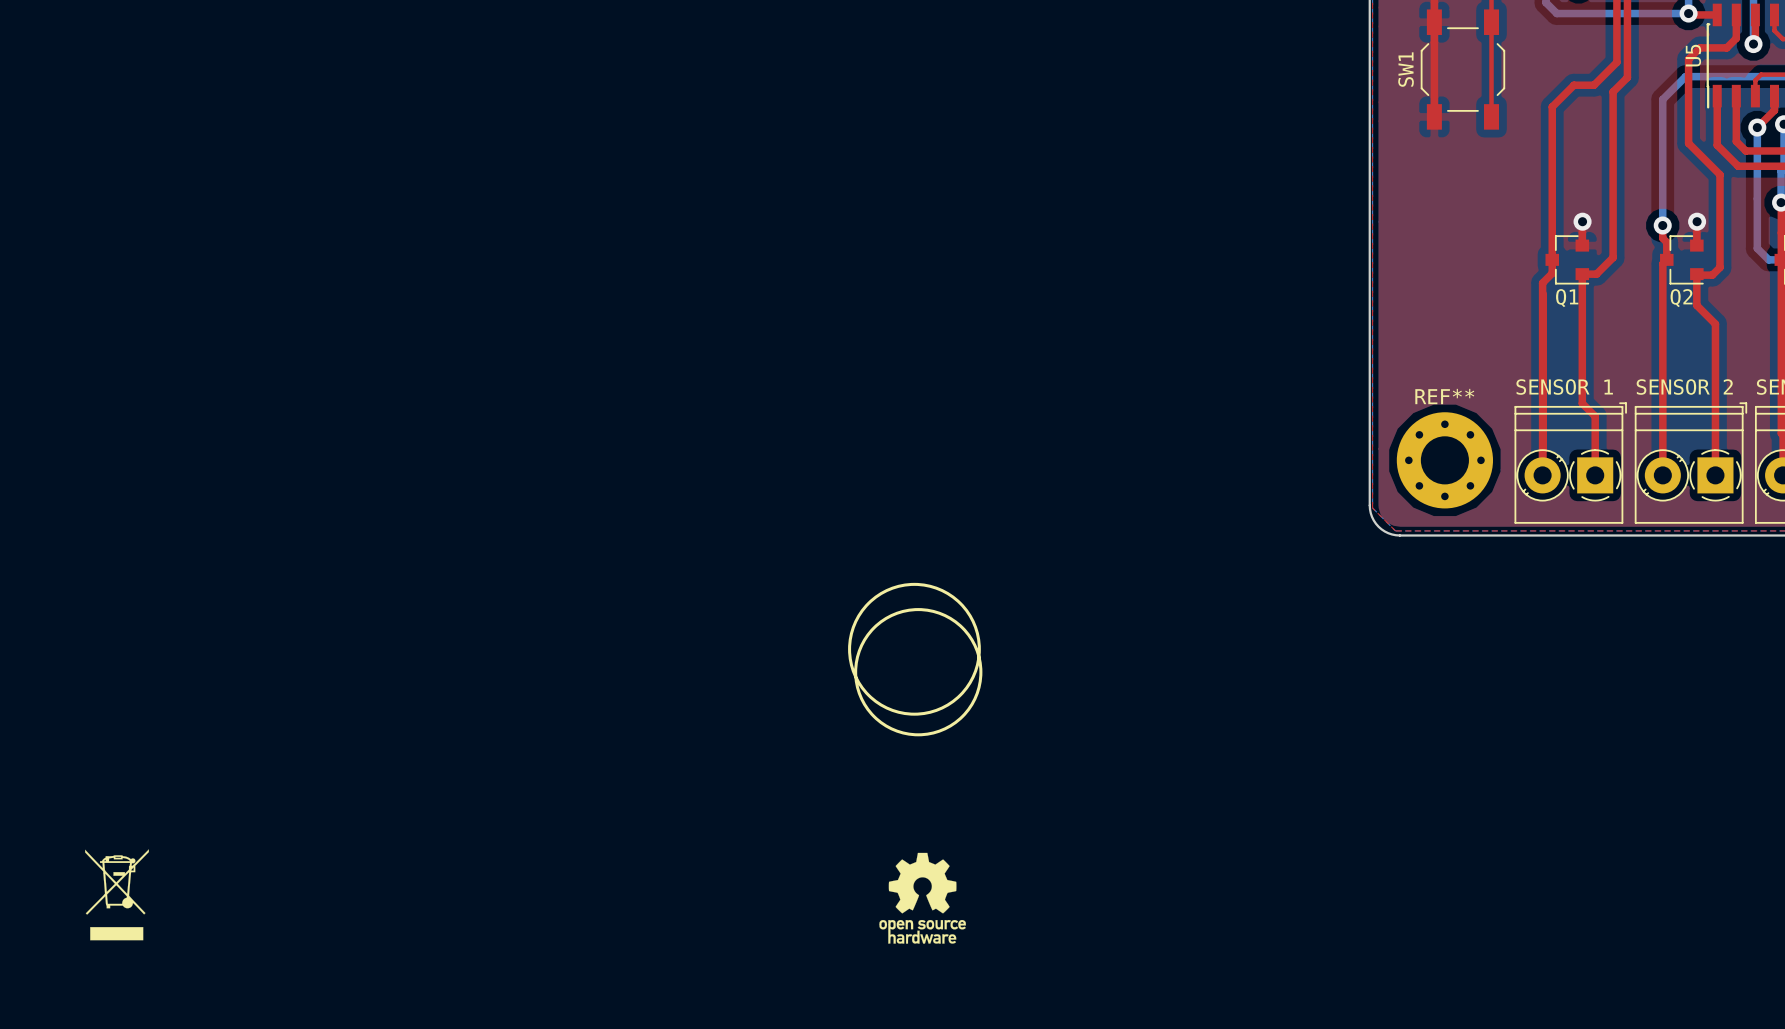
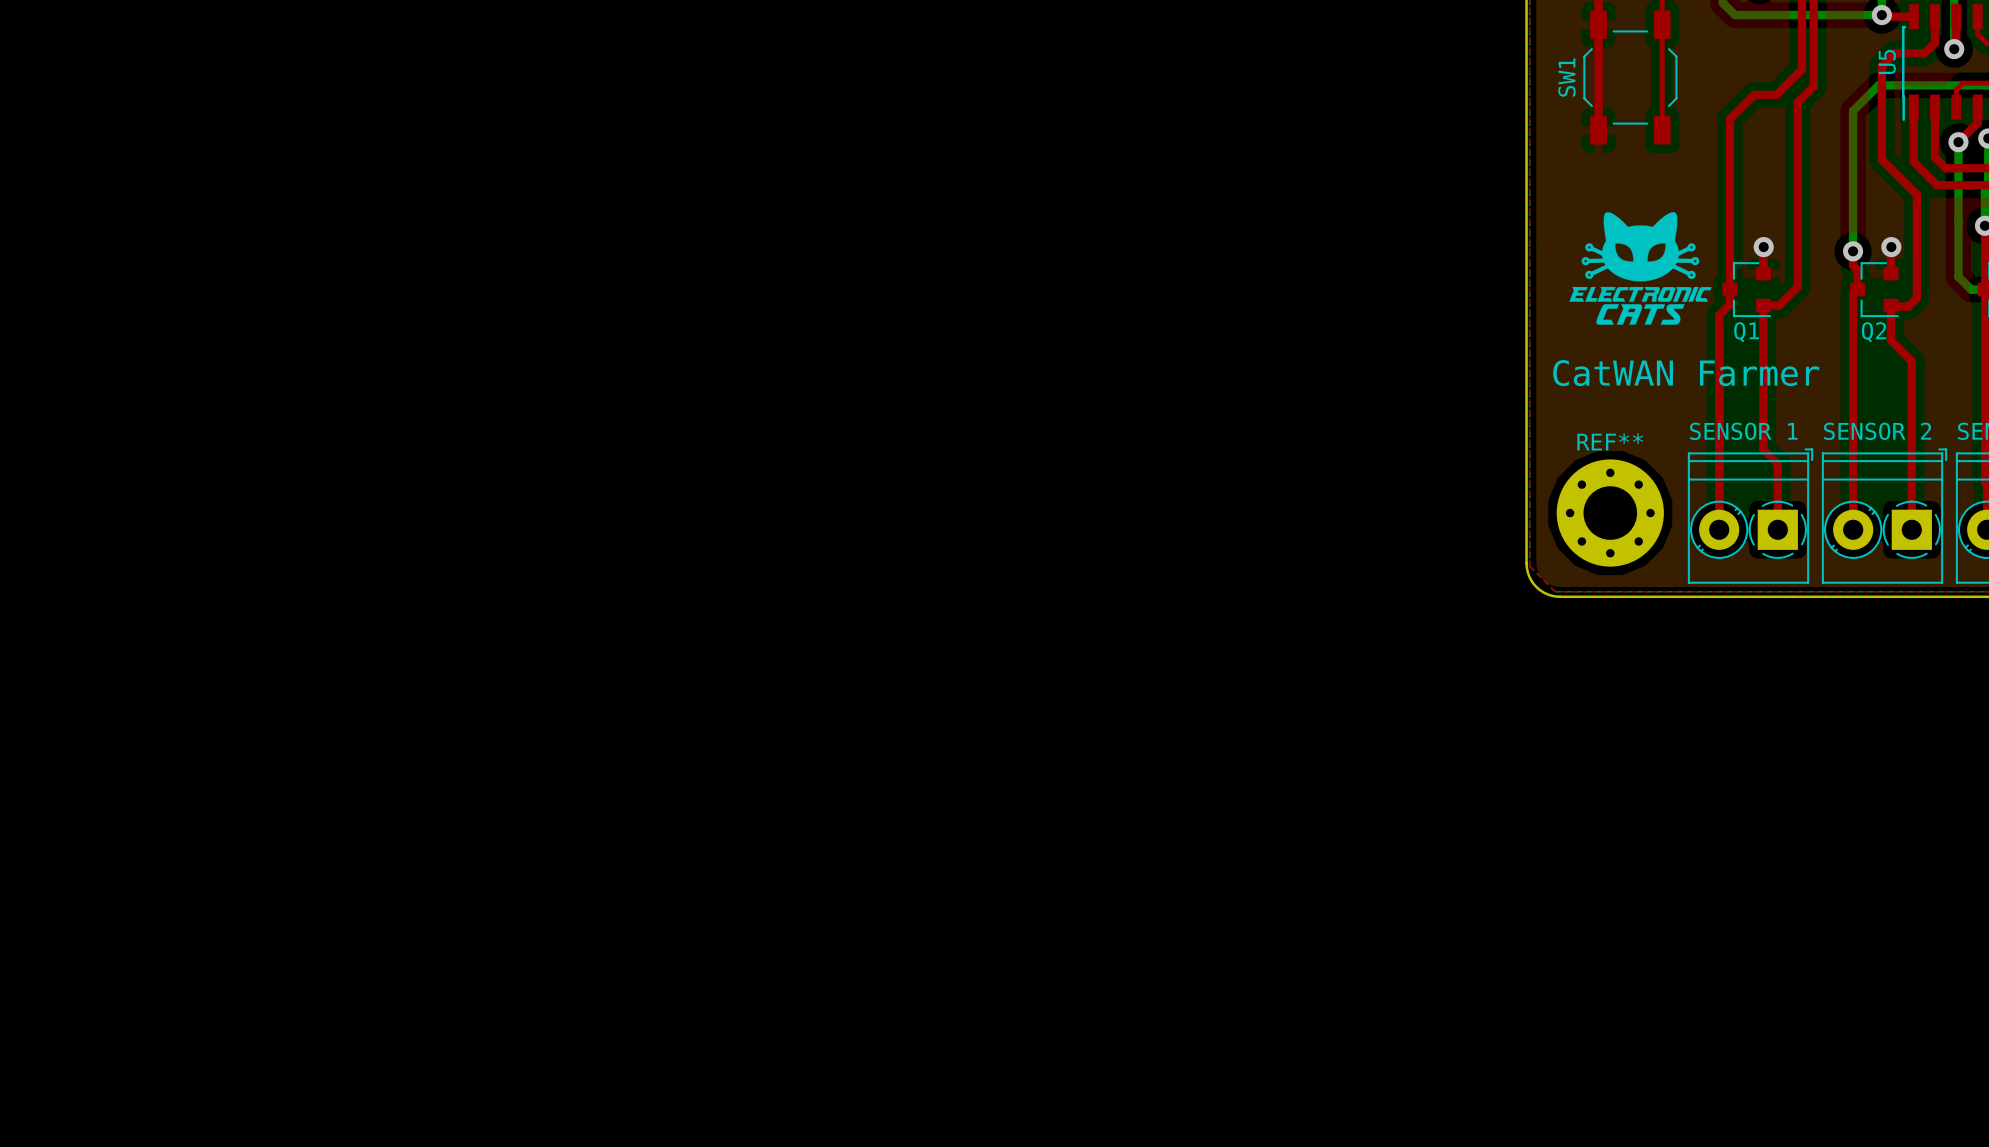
drawing: none -> [1569, 212, 1712, 325]
text: none -> CatWAN Farmer (1686, 373)
drawing: [848, 582, 983, 737] -> none
drawing: [85, 849, 149, 941] -> none
drawing: [879, 852, 966, 944] -> none

